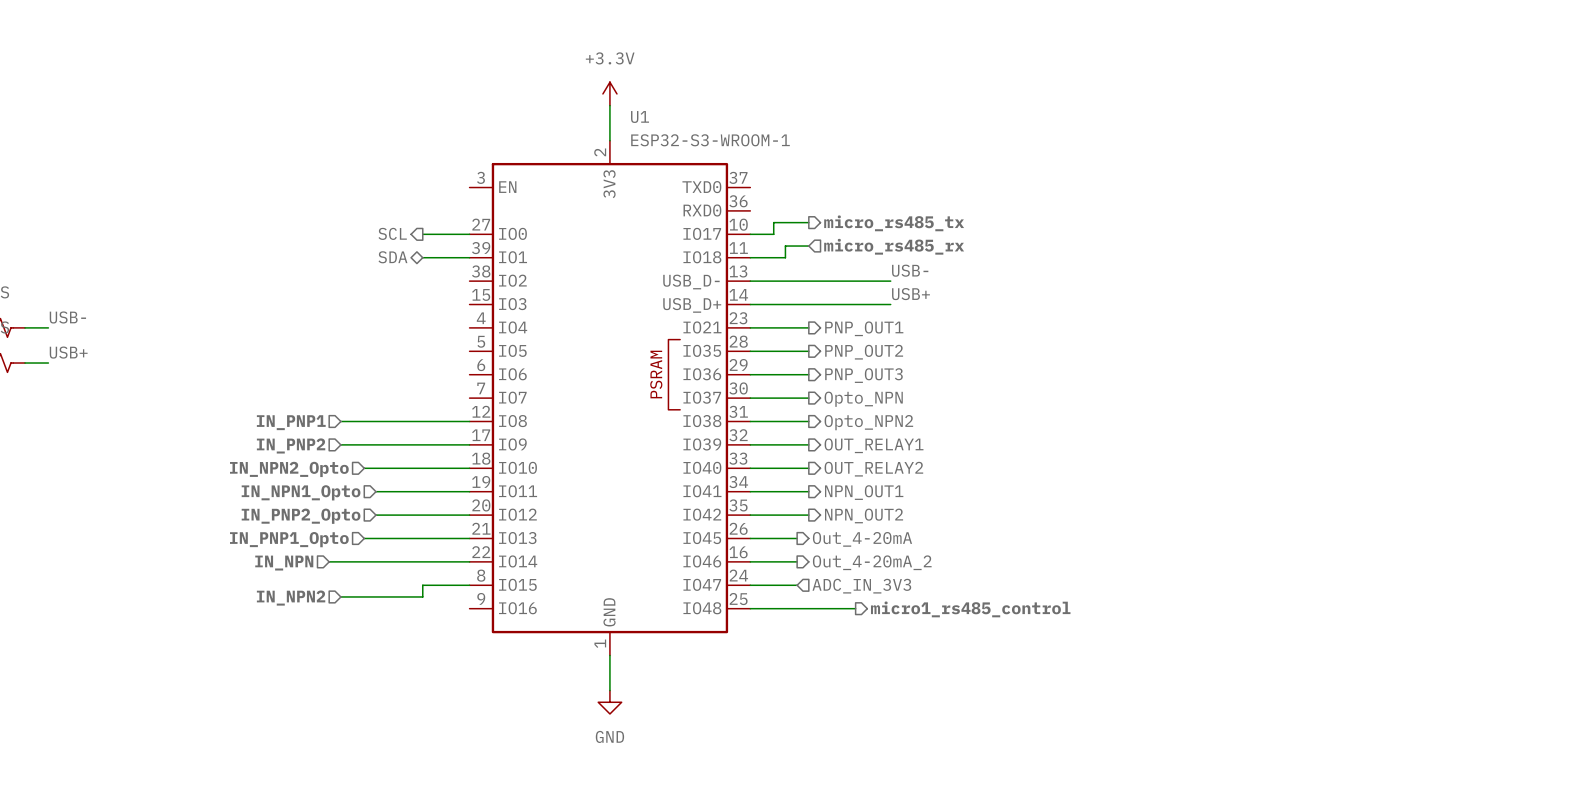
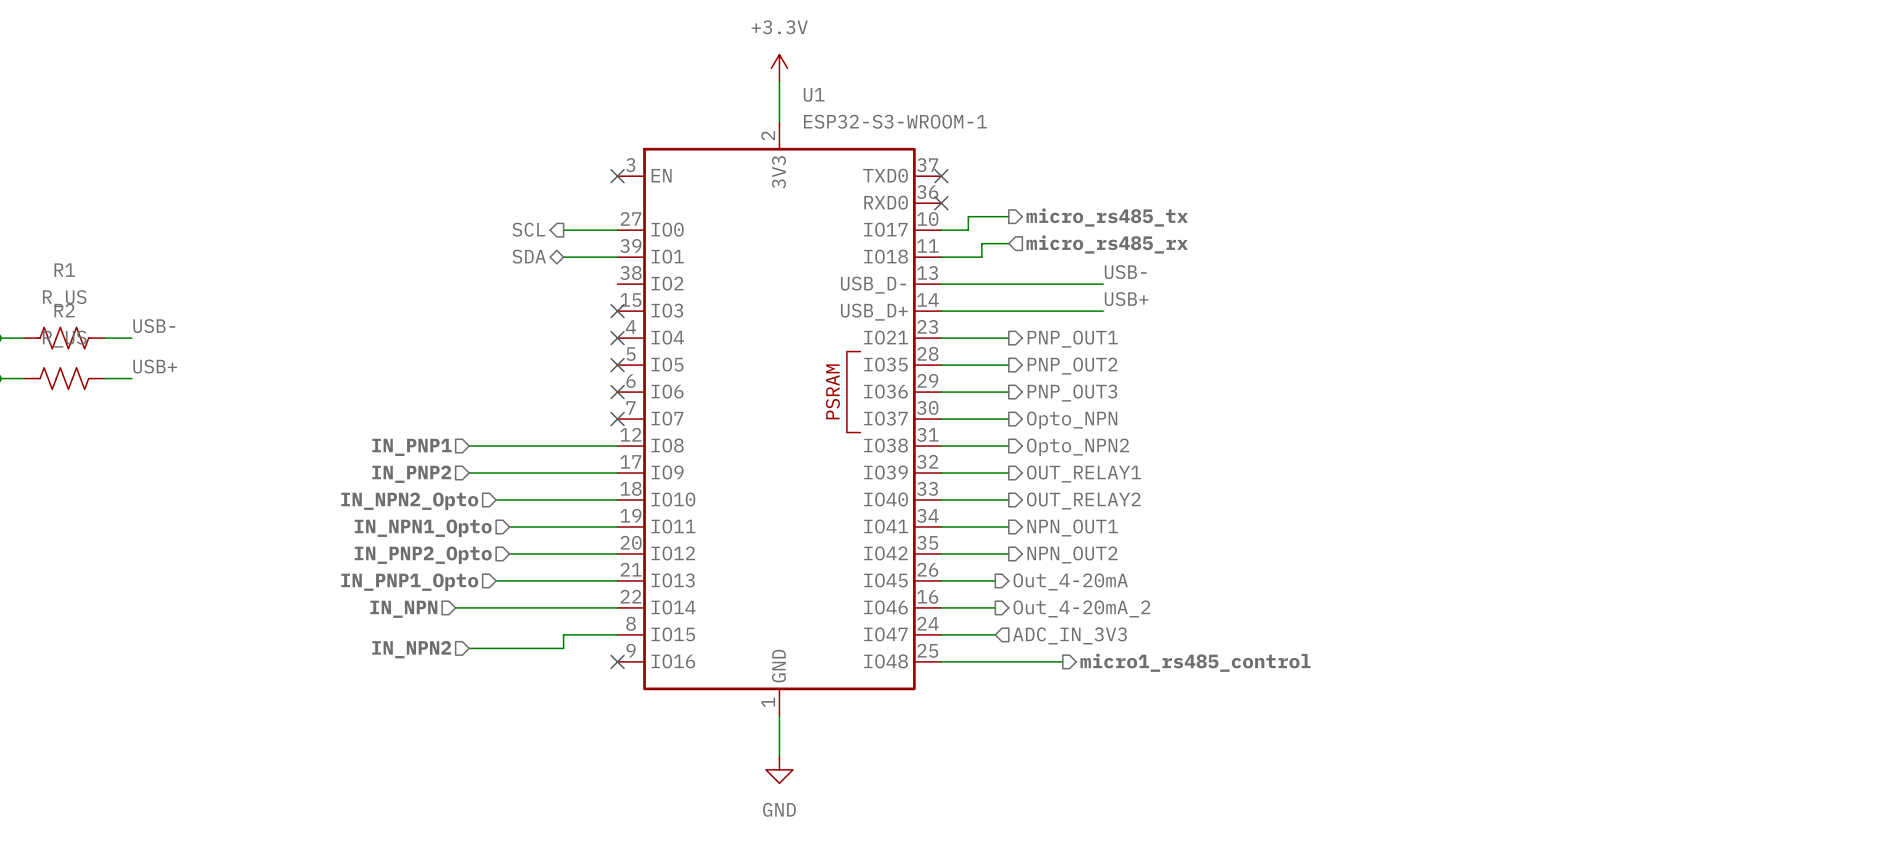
no-connect mark: none -> (617, 176)
no-connect mark: none -> (941, 176)
no-connect mark: none -> (941, 203)
no-connect mark: none -> (617, 311)
no-connect mark: none -> (617, 338)
no-connect mark: none -> (617, 365)
no-connect mark: none -> (617, 392)
no-connect mark: none -> (617, 419)
no-connect mark: none -> (617, 661)

